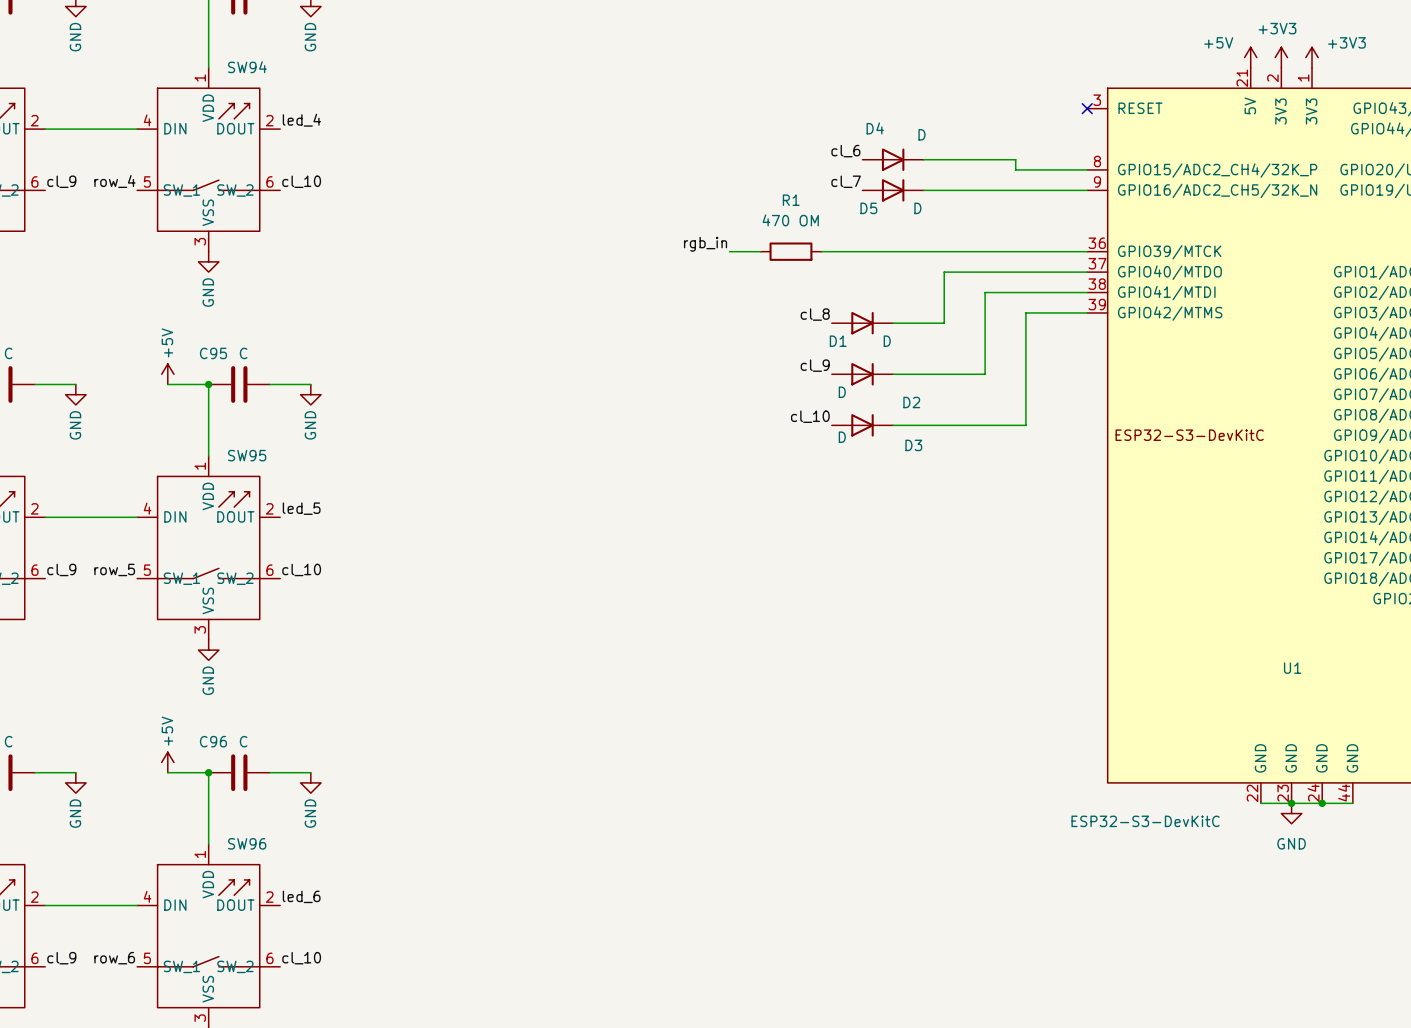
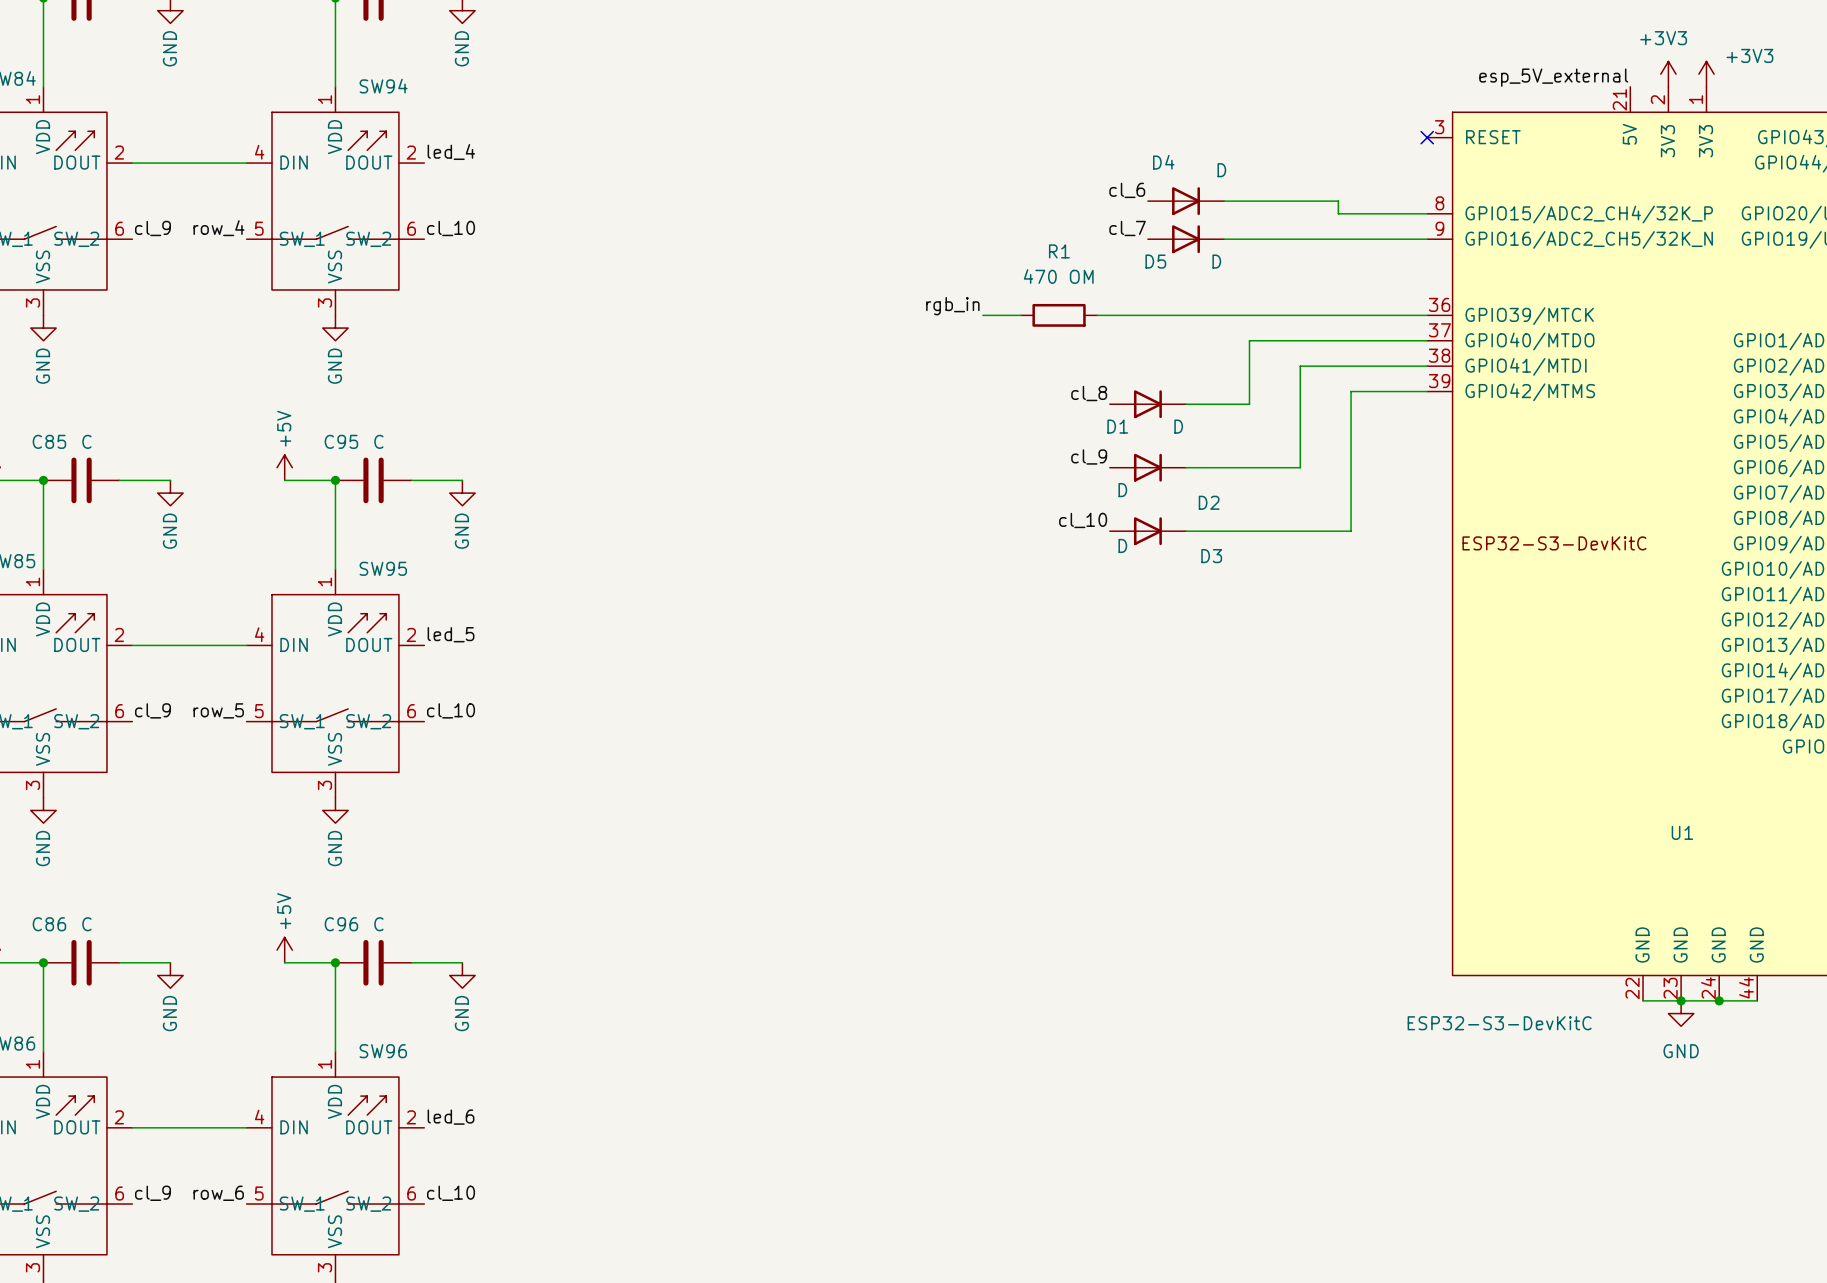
power symbol: +5V (1250, 57) -> none
label: none -> esp_5V_external (1553, 77)

